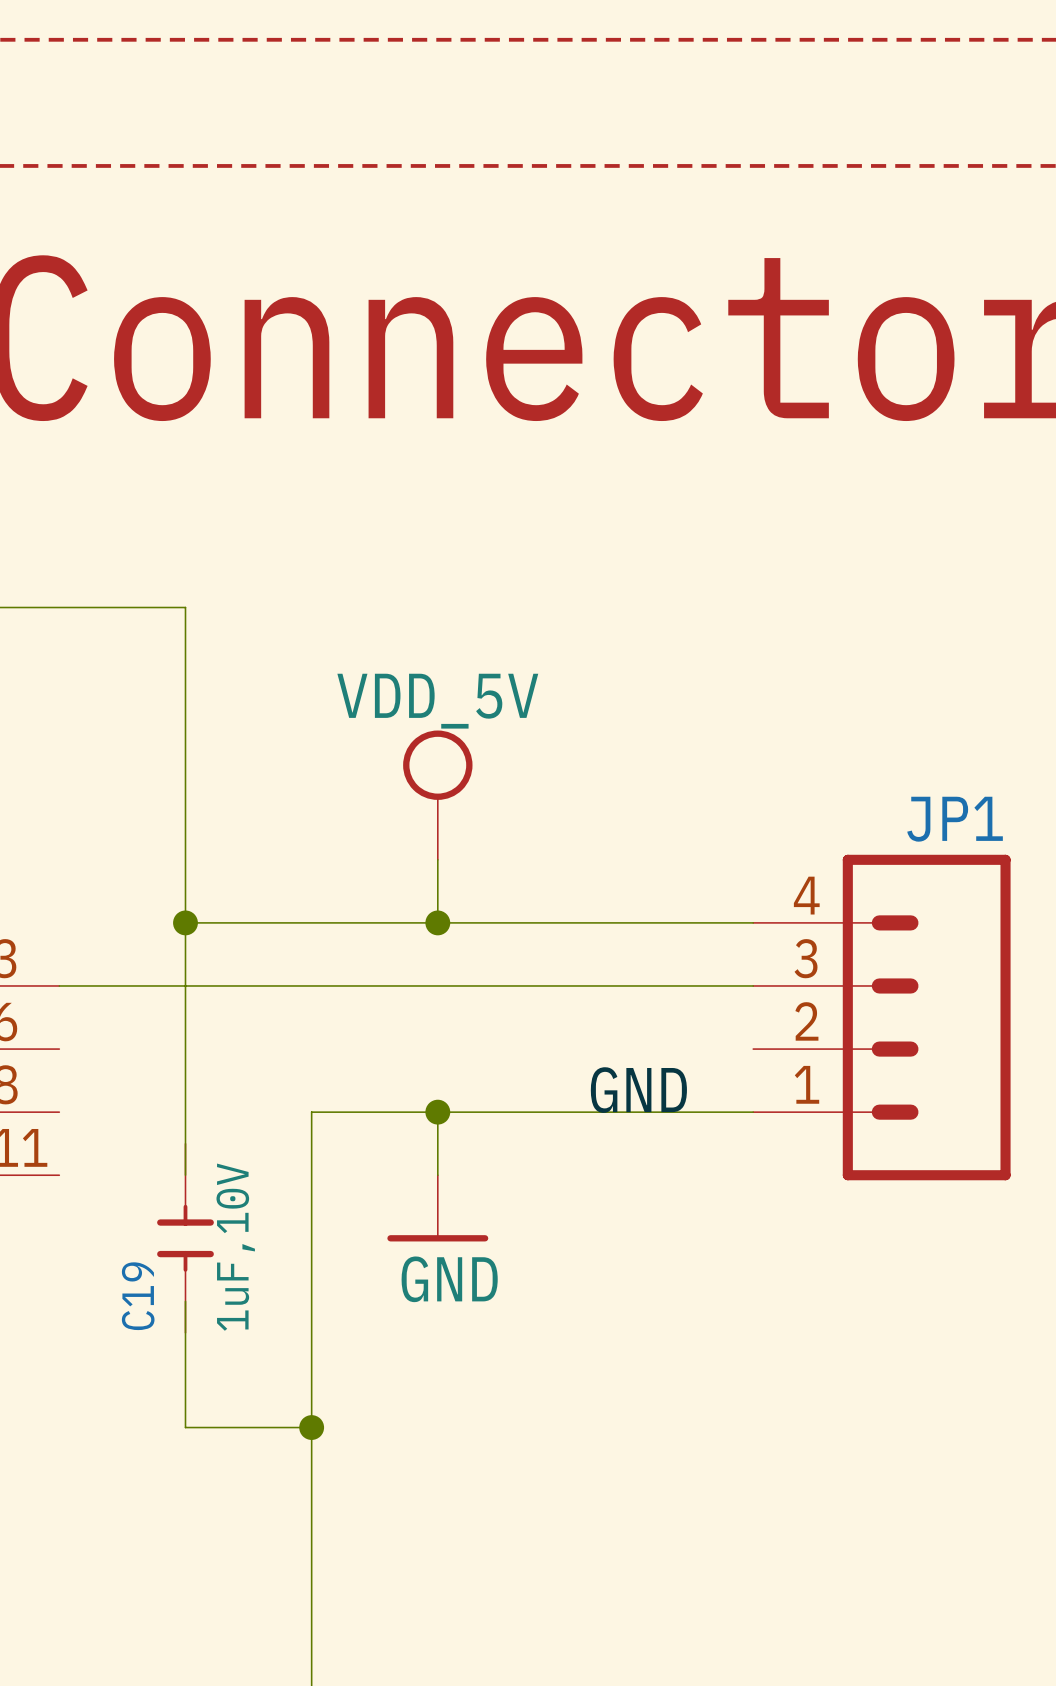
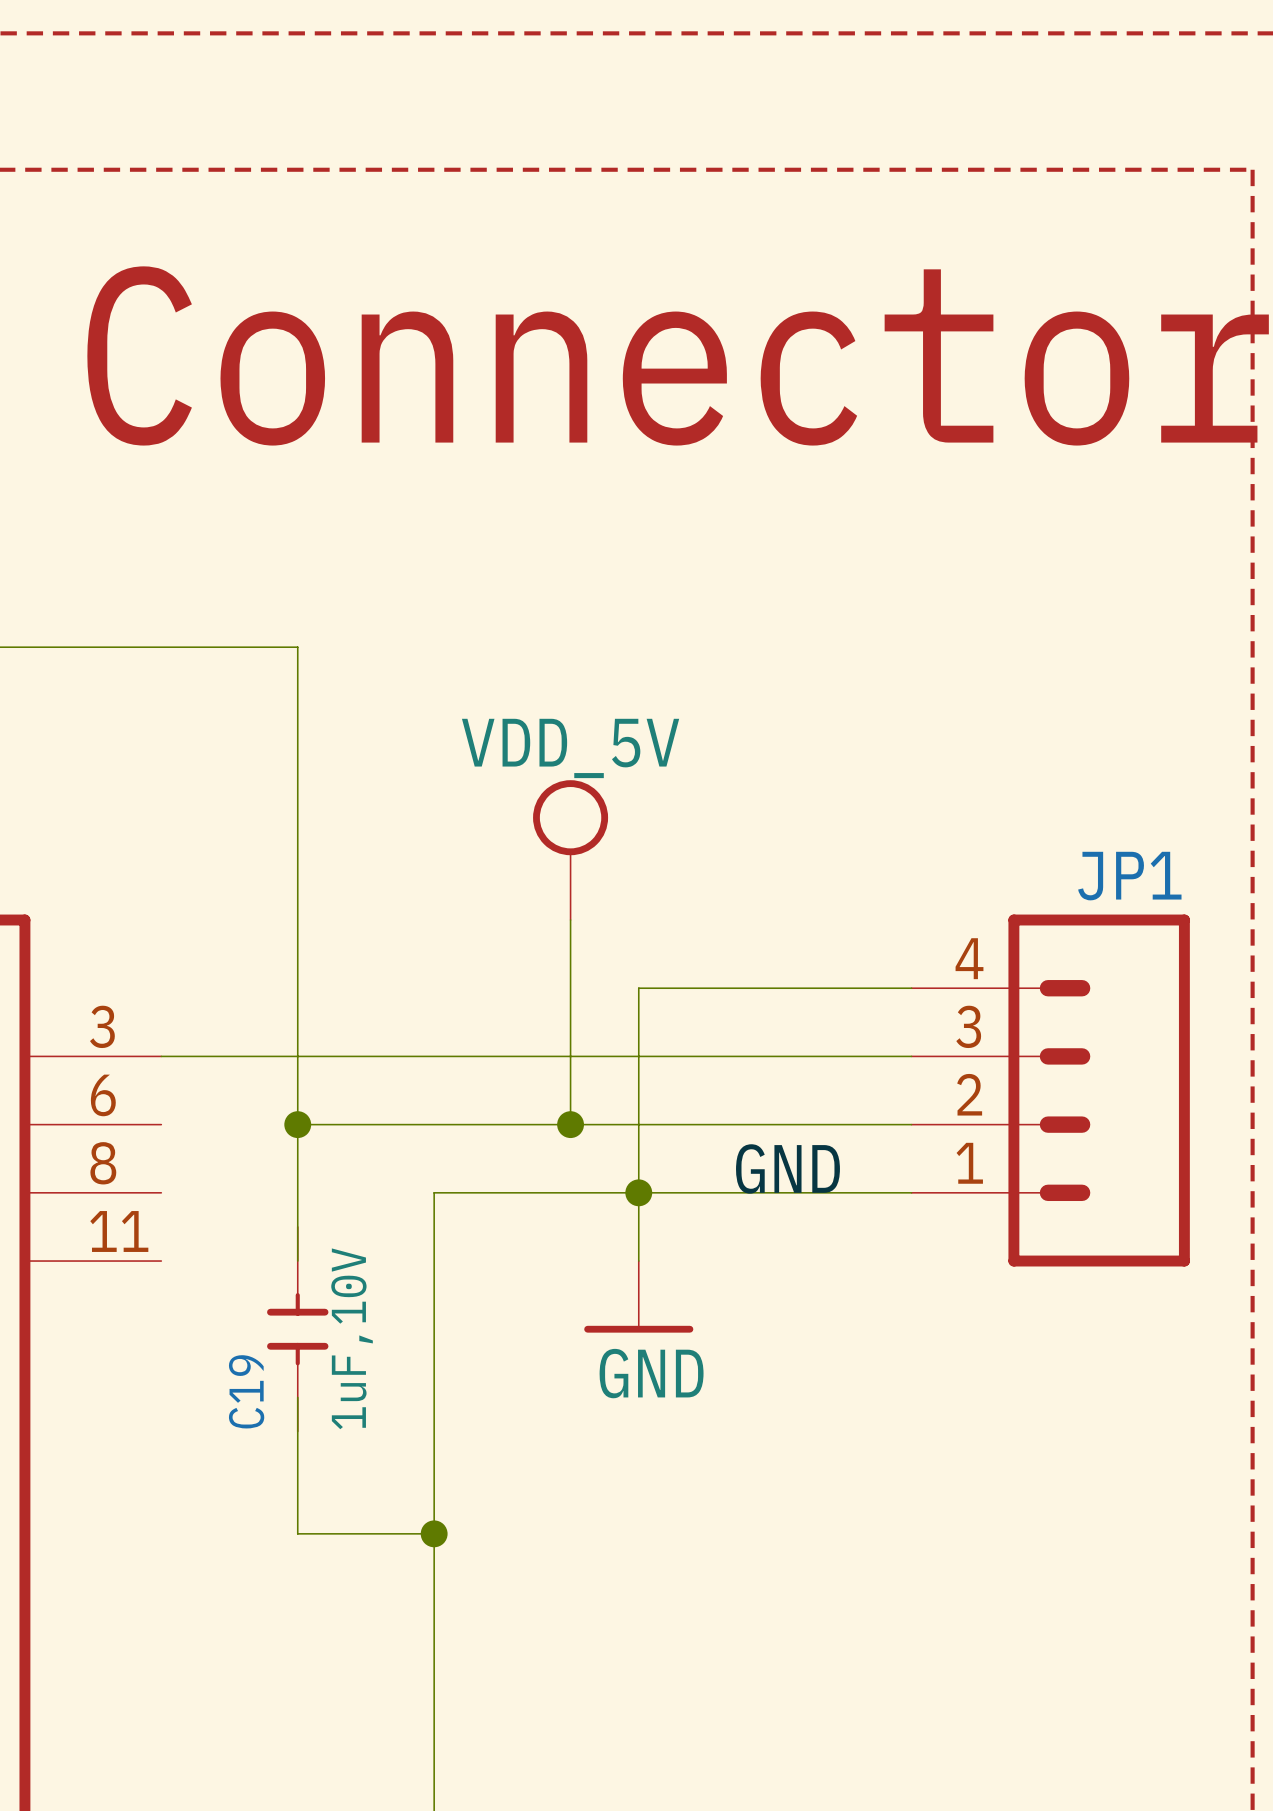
wire: (185, 922) (500, 922) -> (638, 1261) (638, 988)
junction position: (185, 922) -> (297, 1124)
wire: none -> (570, 988) (570, 1124)
junction: (437, 922) -> none
wire: none -> (297, 1124) (911, 1124)
junction: none -> (570, 1124)
wire: (437, 1112) (437, 1175) -> none
junction: (437, 1112) -> none
junction: none -> (638, 1192)
power symbol position: GND (437, 1208) -> GND (638, 1296)

